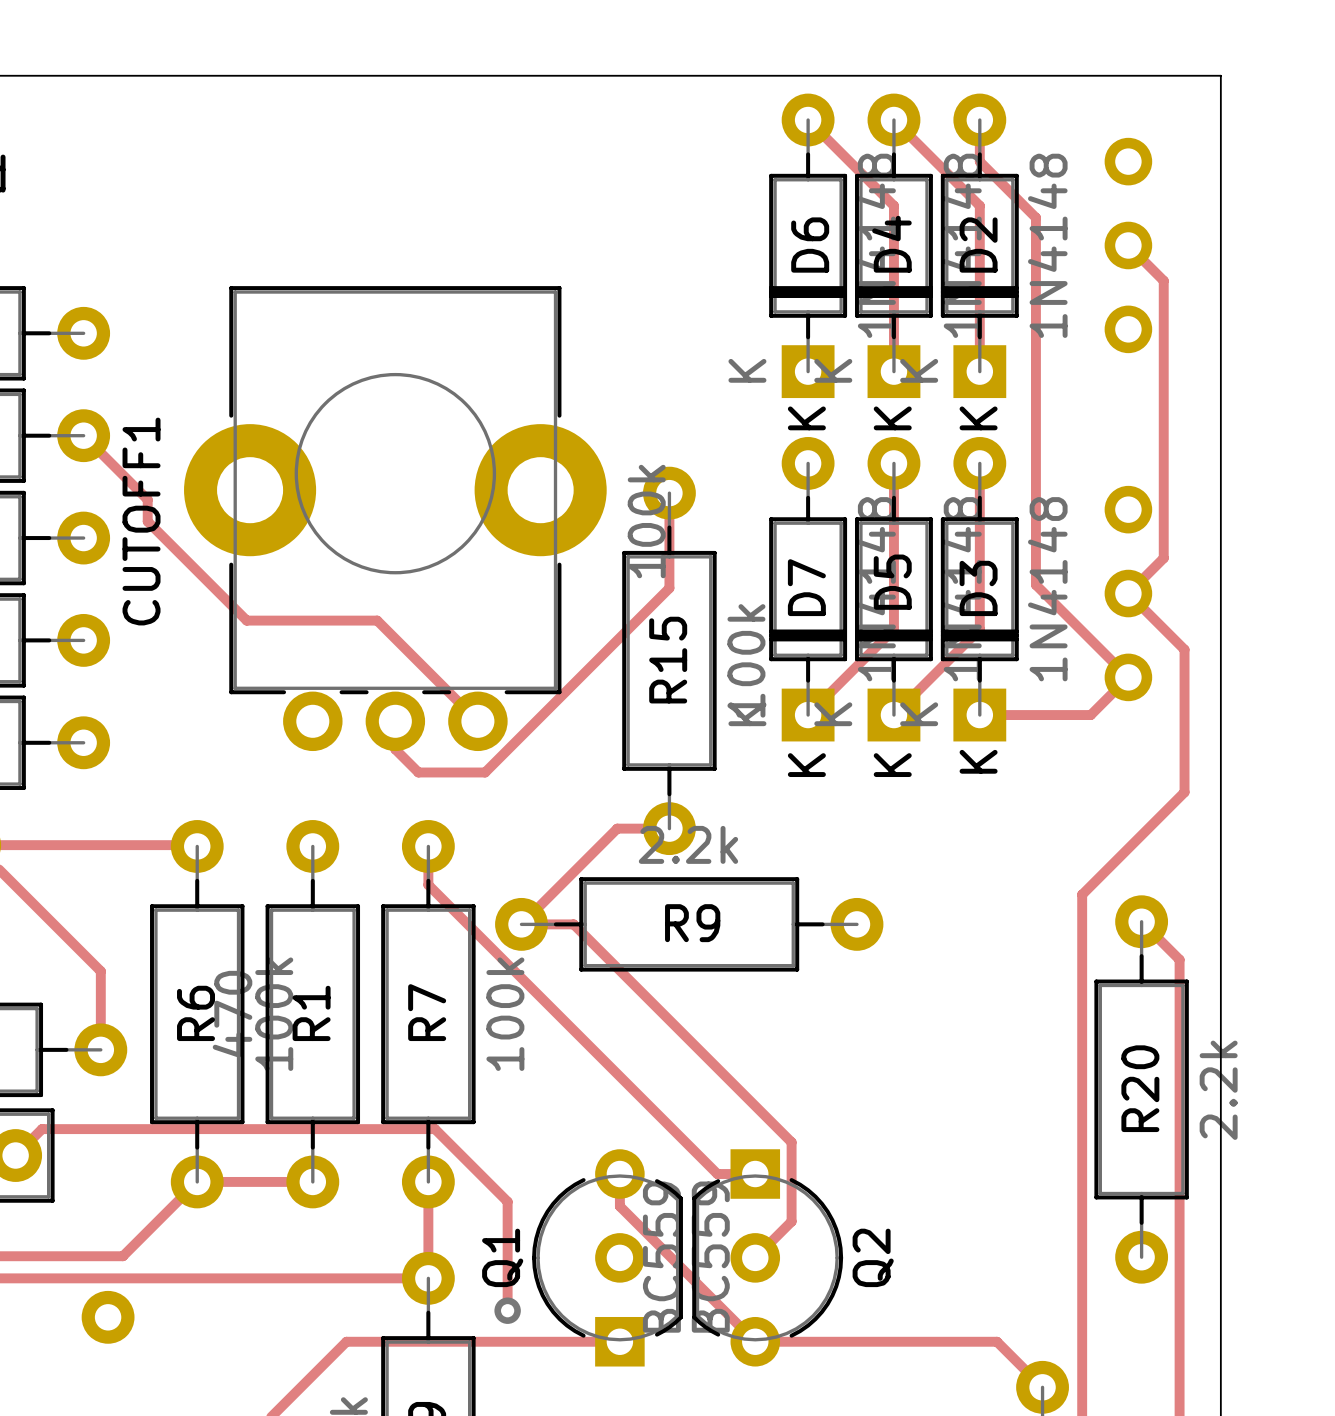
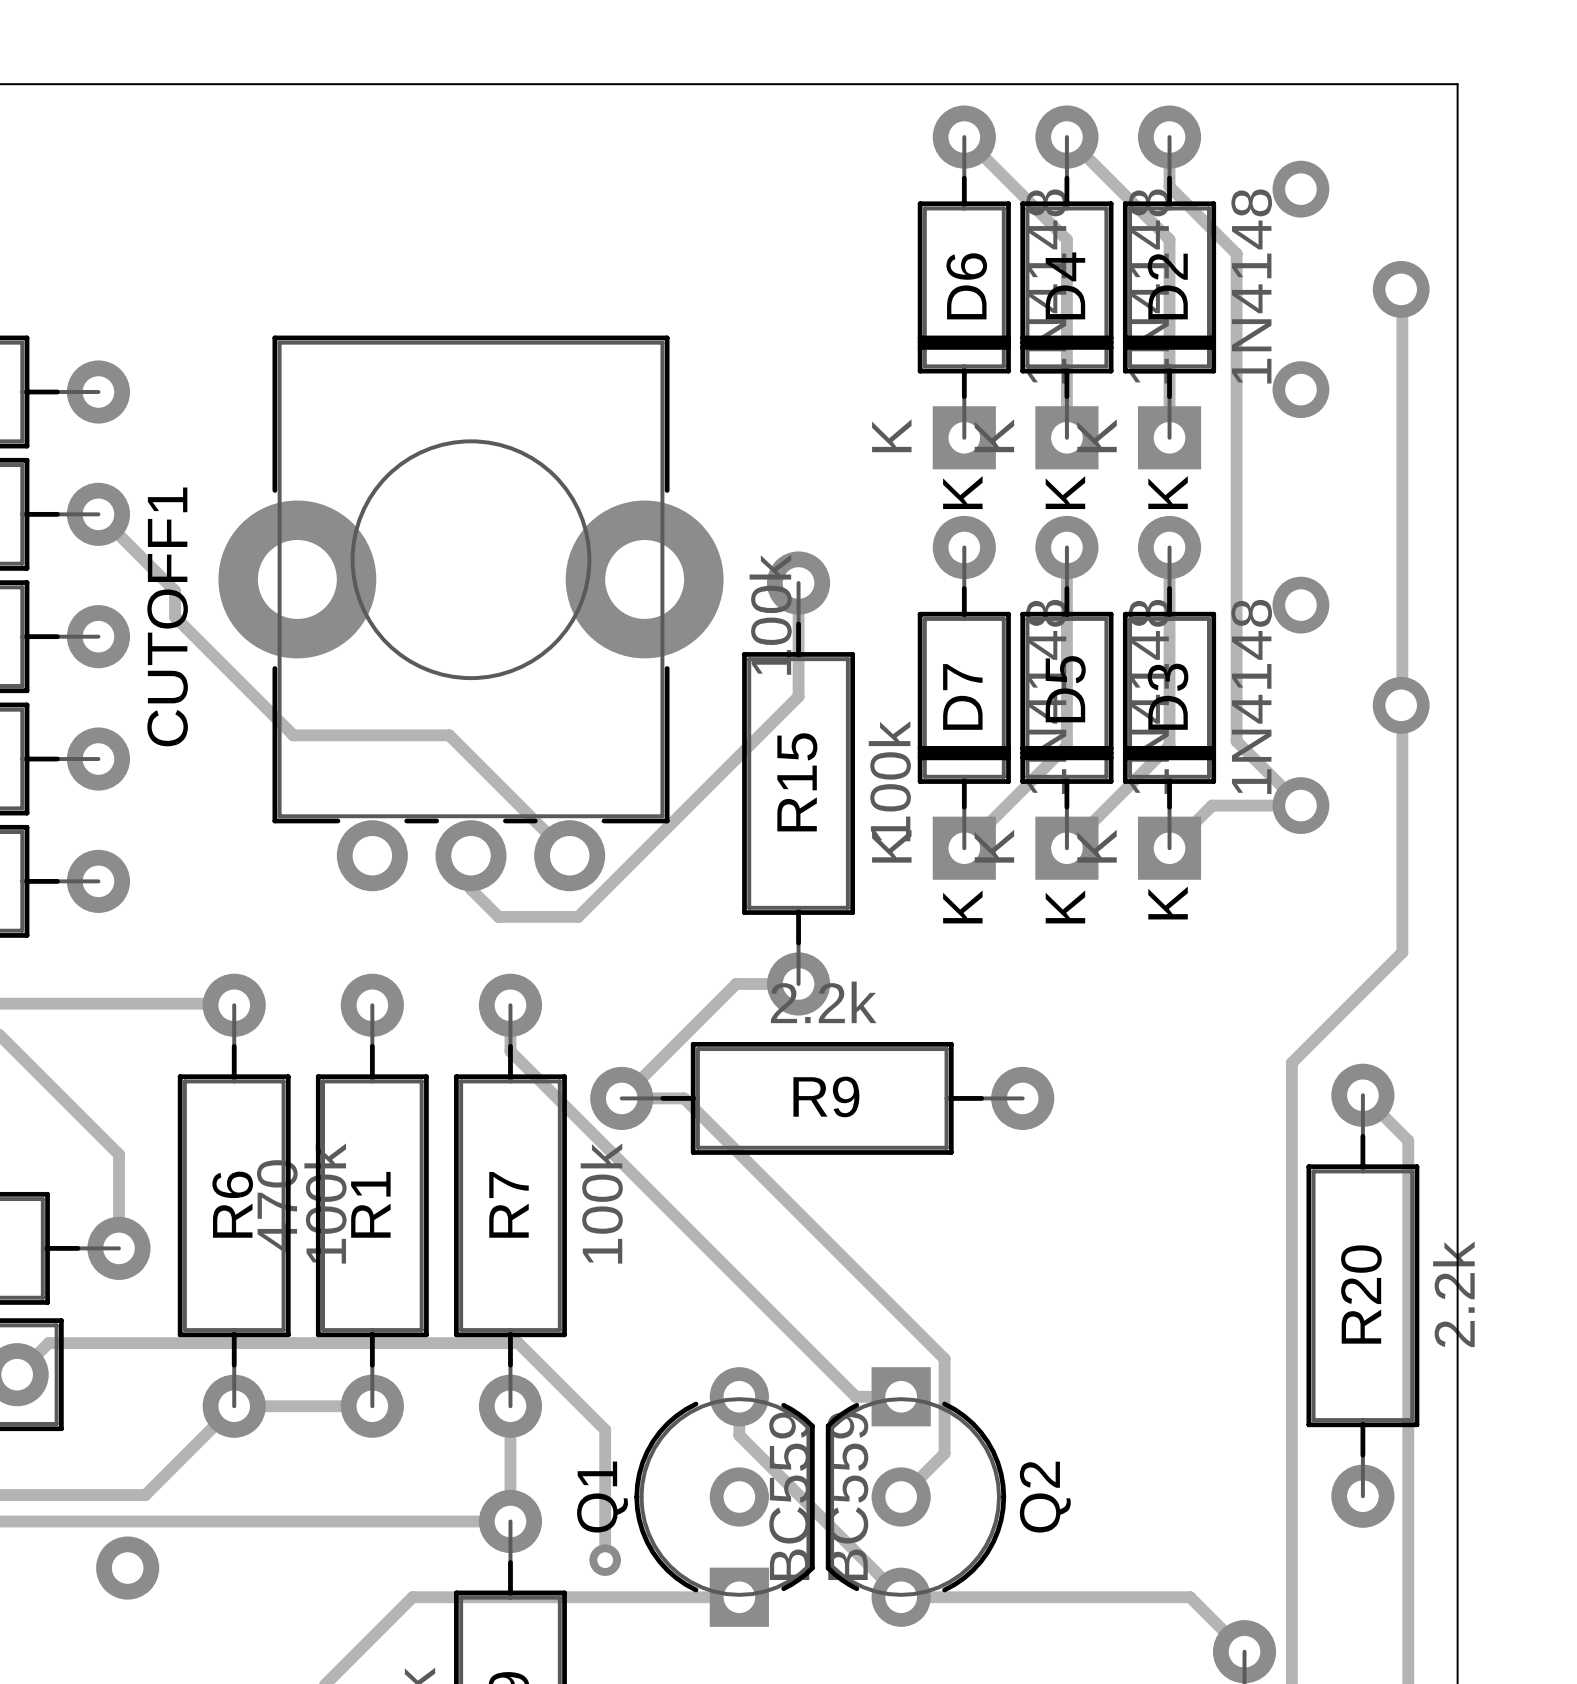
part footprint: [1104, 137, 1153, 354] -> [1272, 160, 1430, 419]
track: (1128, 245) (1163, 280) (1163, 558) (1128, 593) (1184, 649) (1184, 792) (1174, 802) -> (1401, 289) (1402, 952)
part footprint: [1104, 485, 1153, 702] -> [1272, 576, 1430, 835]
track: (1035, 584) (1128, 677) (1090, 715) (979, 715) -> (1236, 692) (1236, 741) (1300, 805) (1212, 805) (1169, 848)

